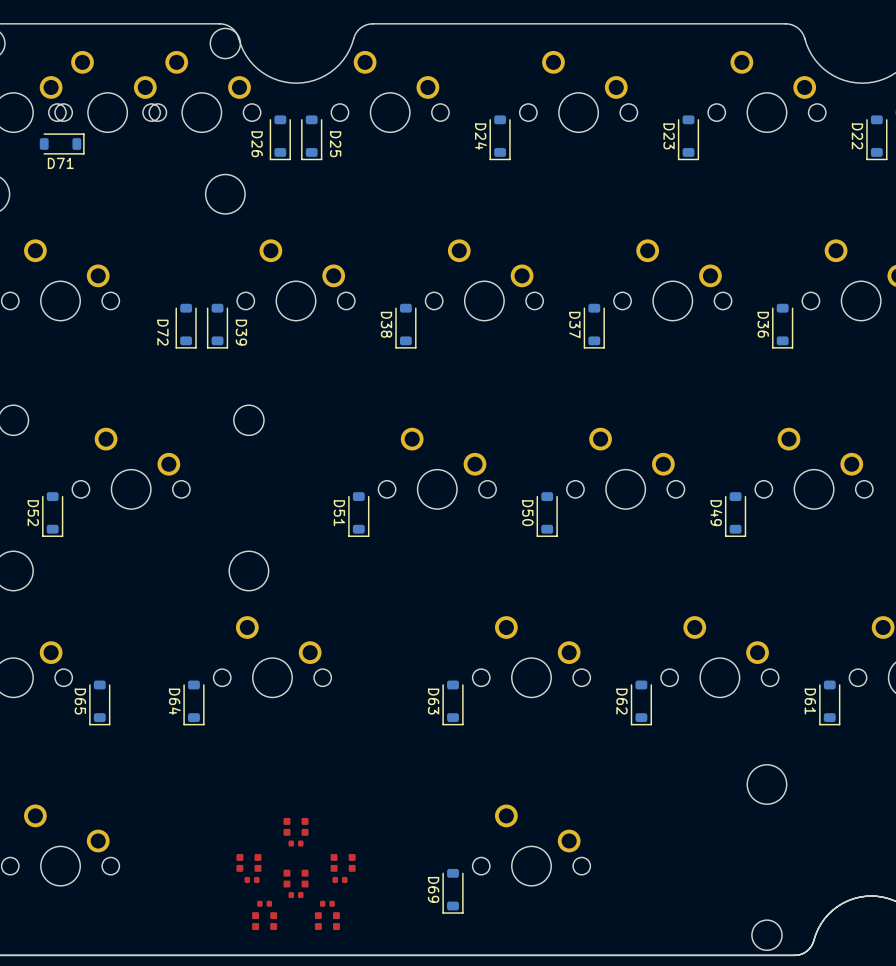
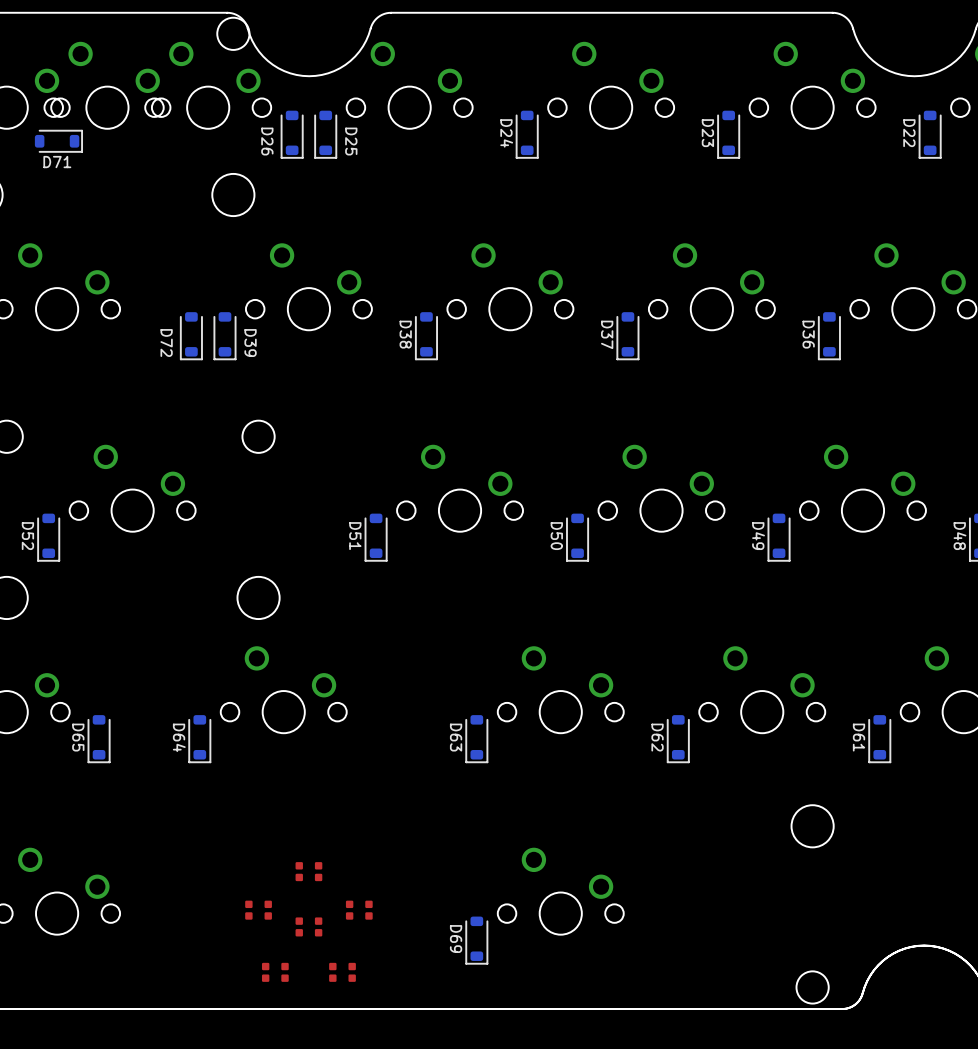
part: (296, 843) -> none
part: (252, 879) -> none
part: (339, 879) -> none
part: (296, 895) -> none
part: (264, 903) -> none
part: (327, 903) -> none

